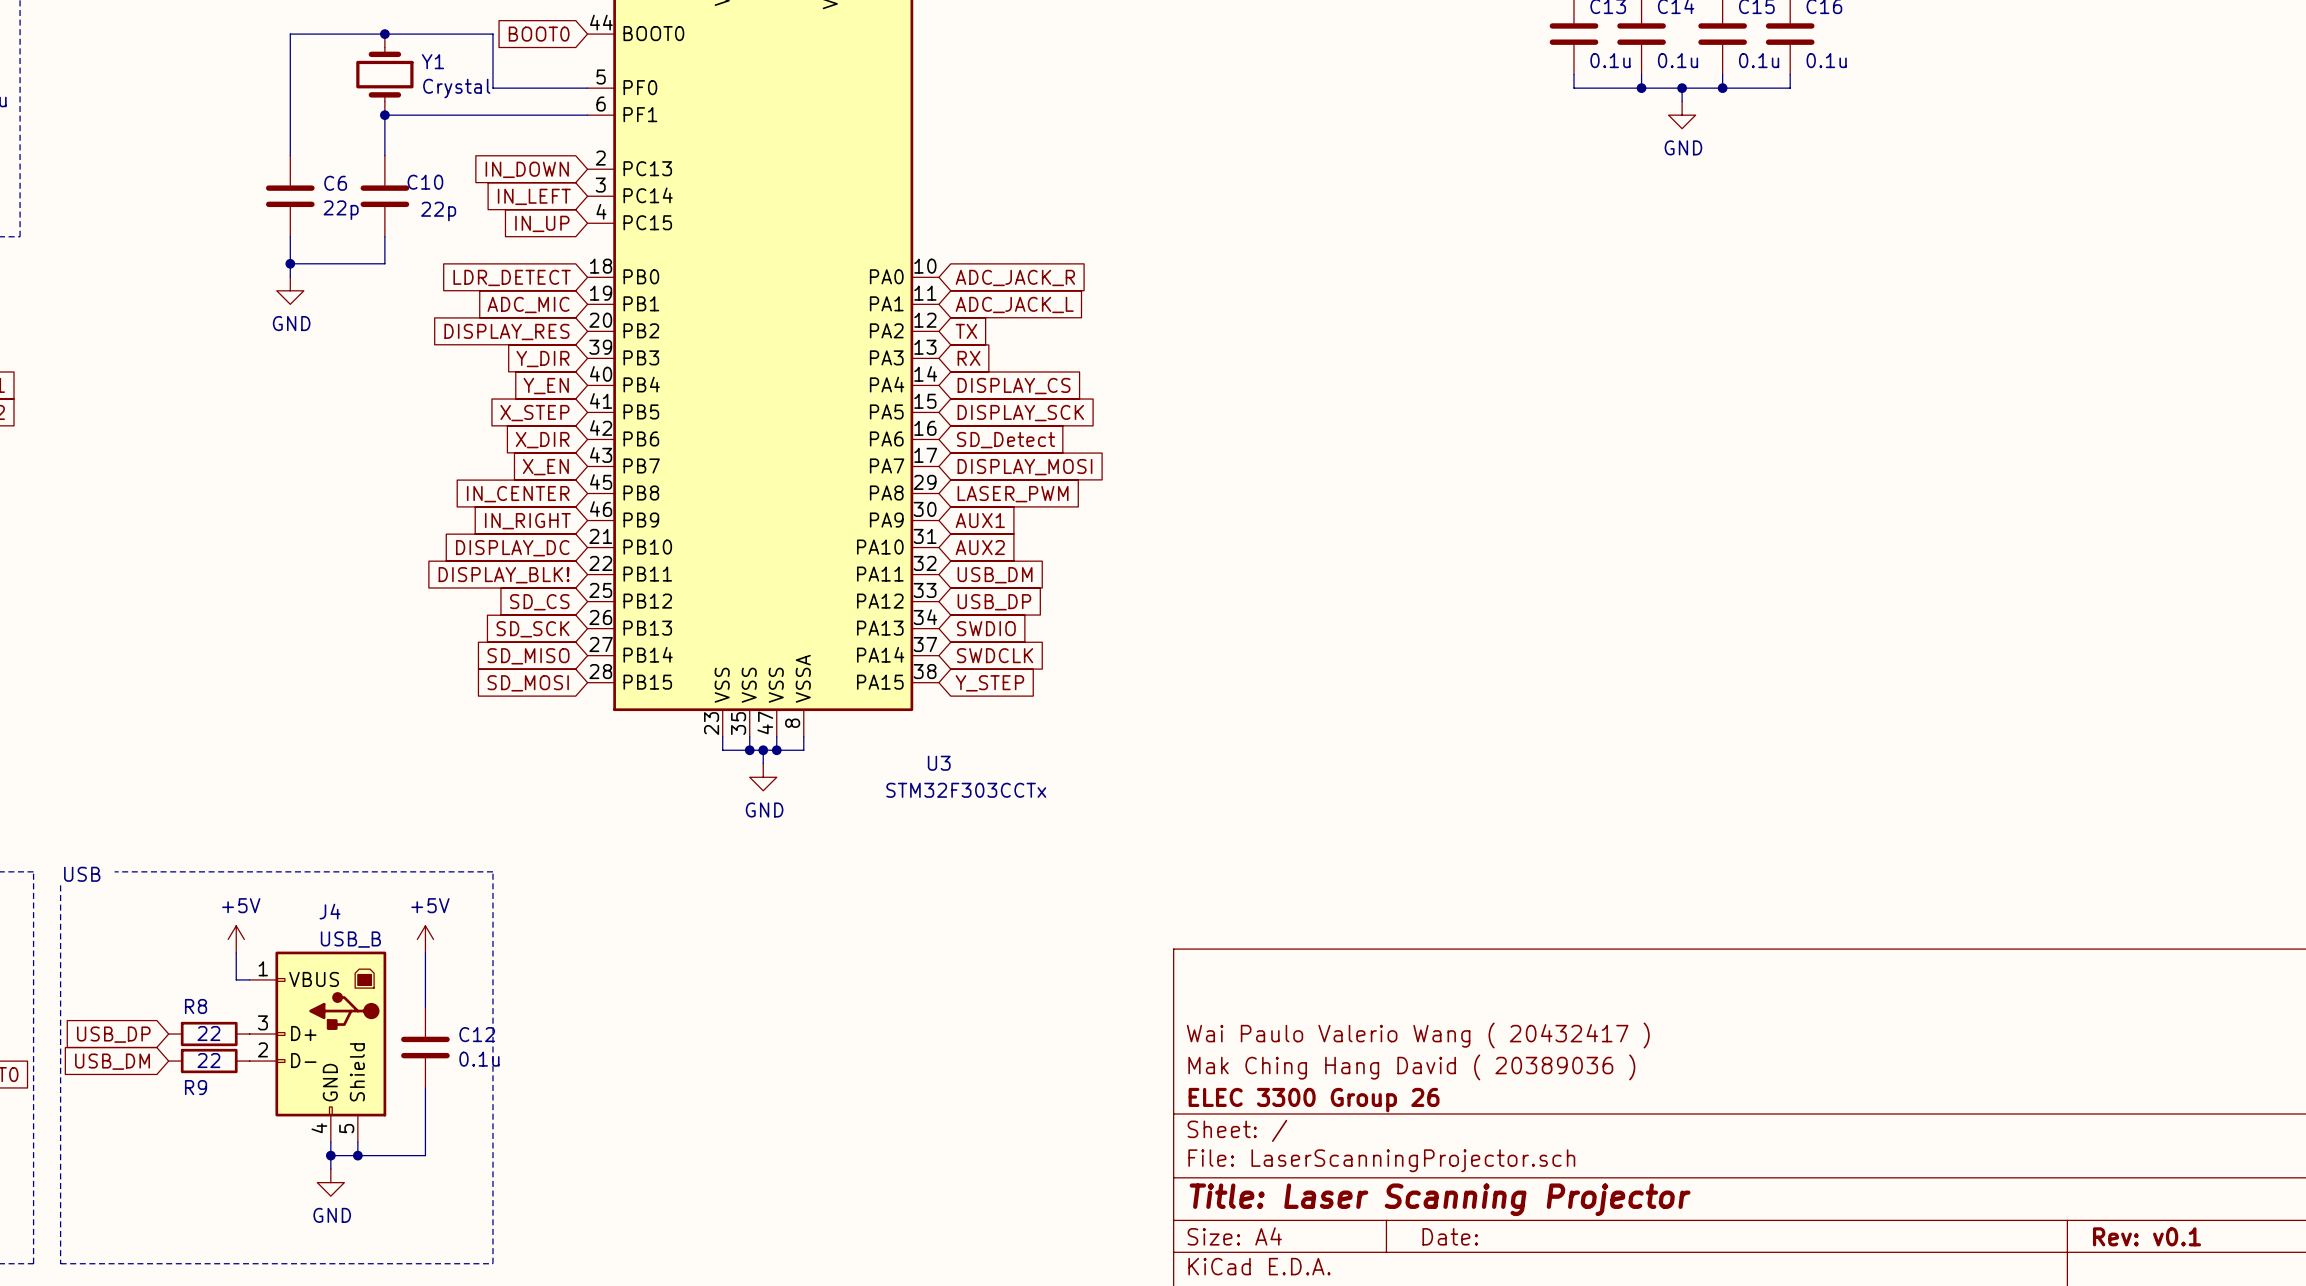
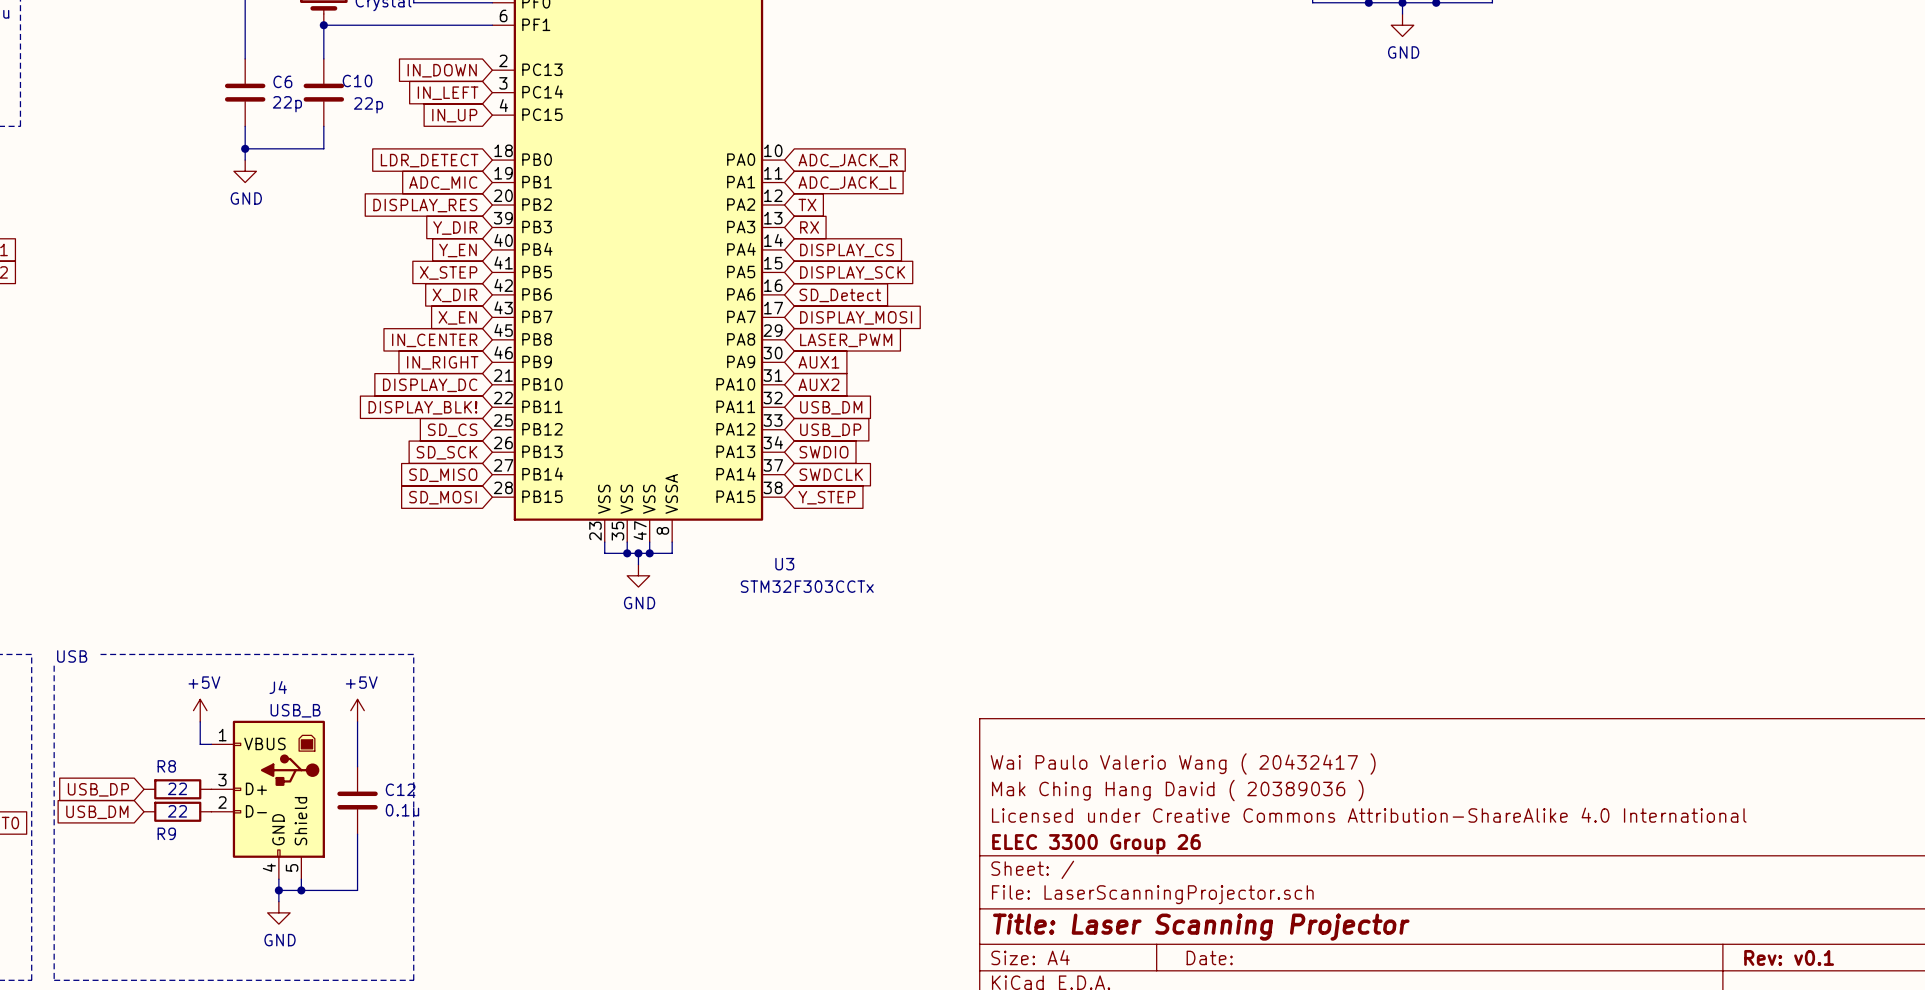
title block: none -> Wai Paulo Valerio Wang ( 20432417 ) (1183, 763)
title block: Wai Paulo Valerio Wang ( 20432417 ) (1418, 1035) -> Mak Ching Hang David ( 20389036 ) (1177, 790)
title block: Mak Ching Hang David ( 20389036 ) (1411, 1067) -> Licensed under Creative Commons Attribution-ShareAlike 4.0 International (1369, 815)

